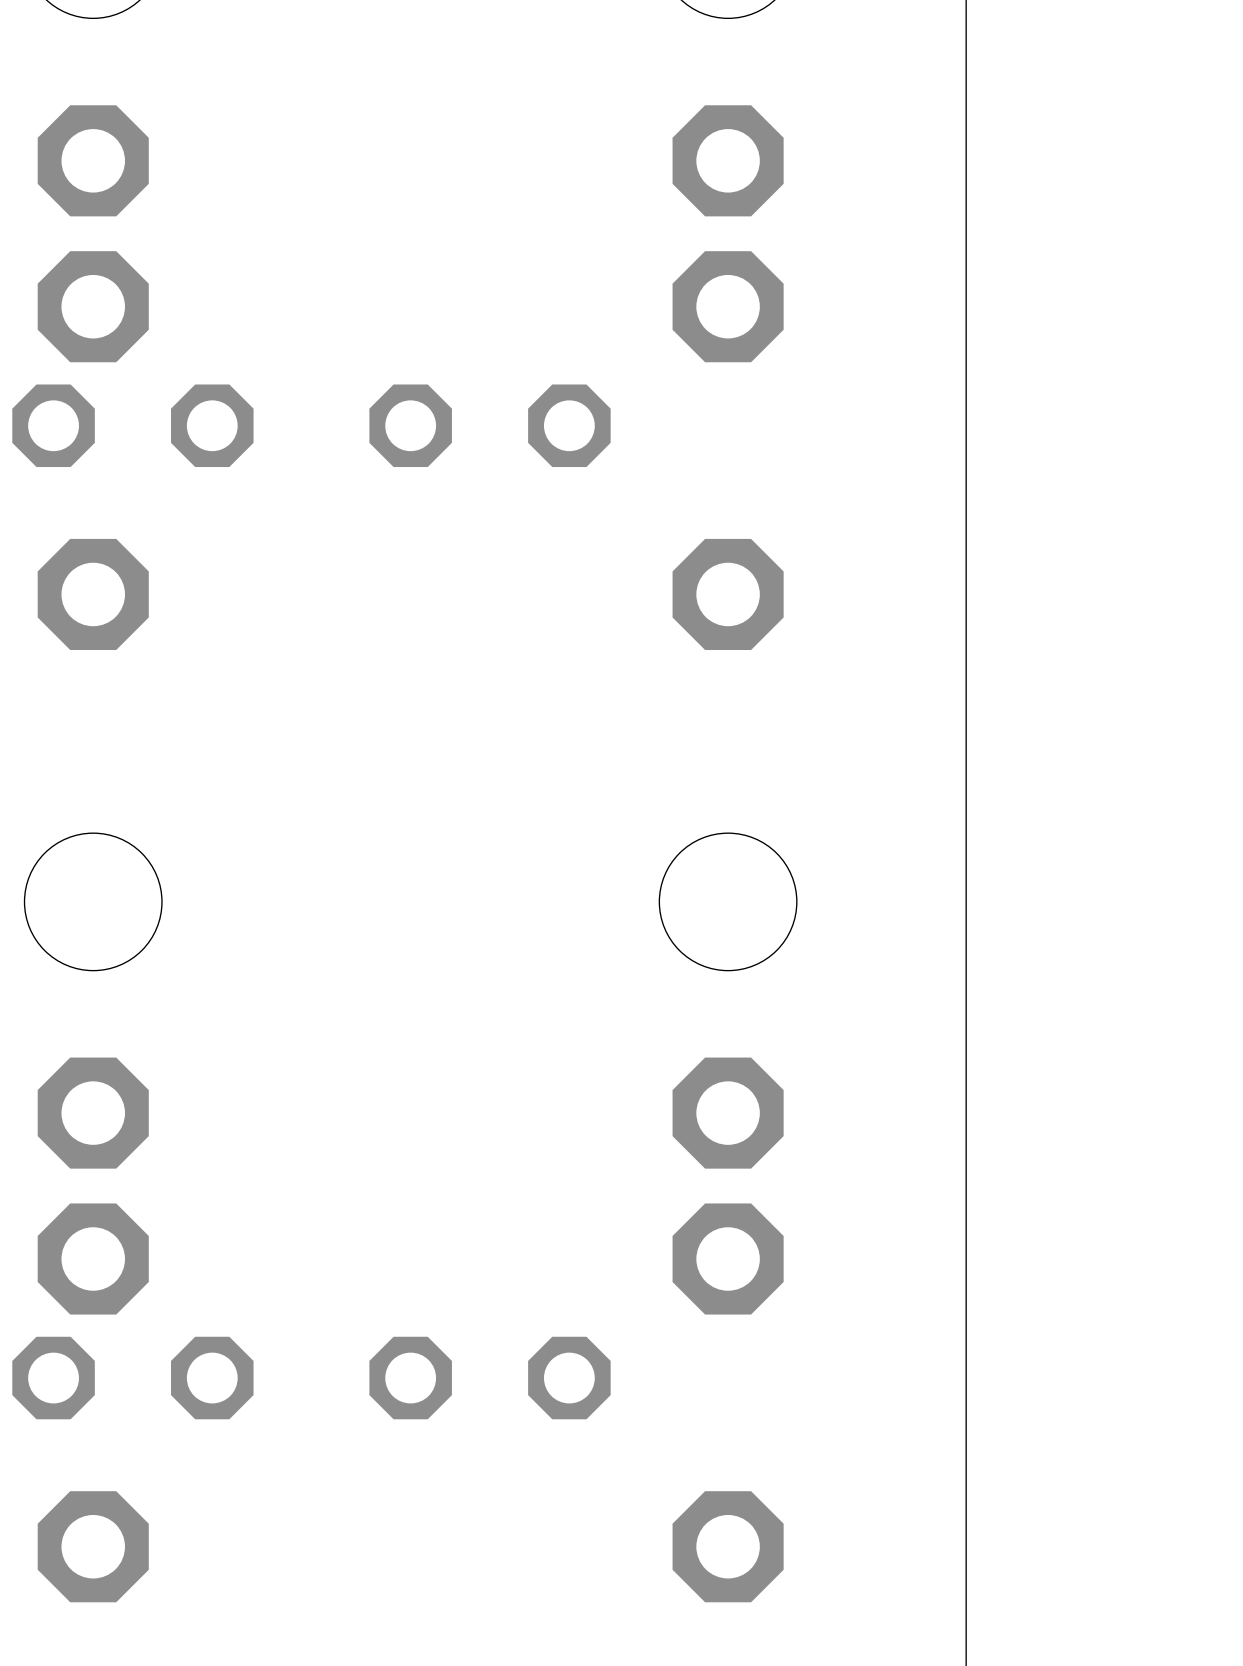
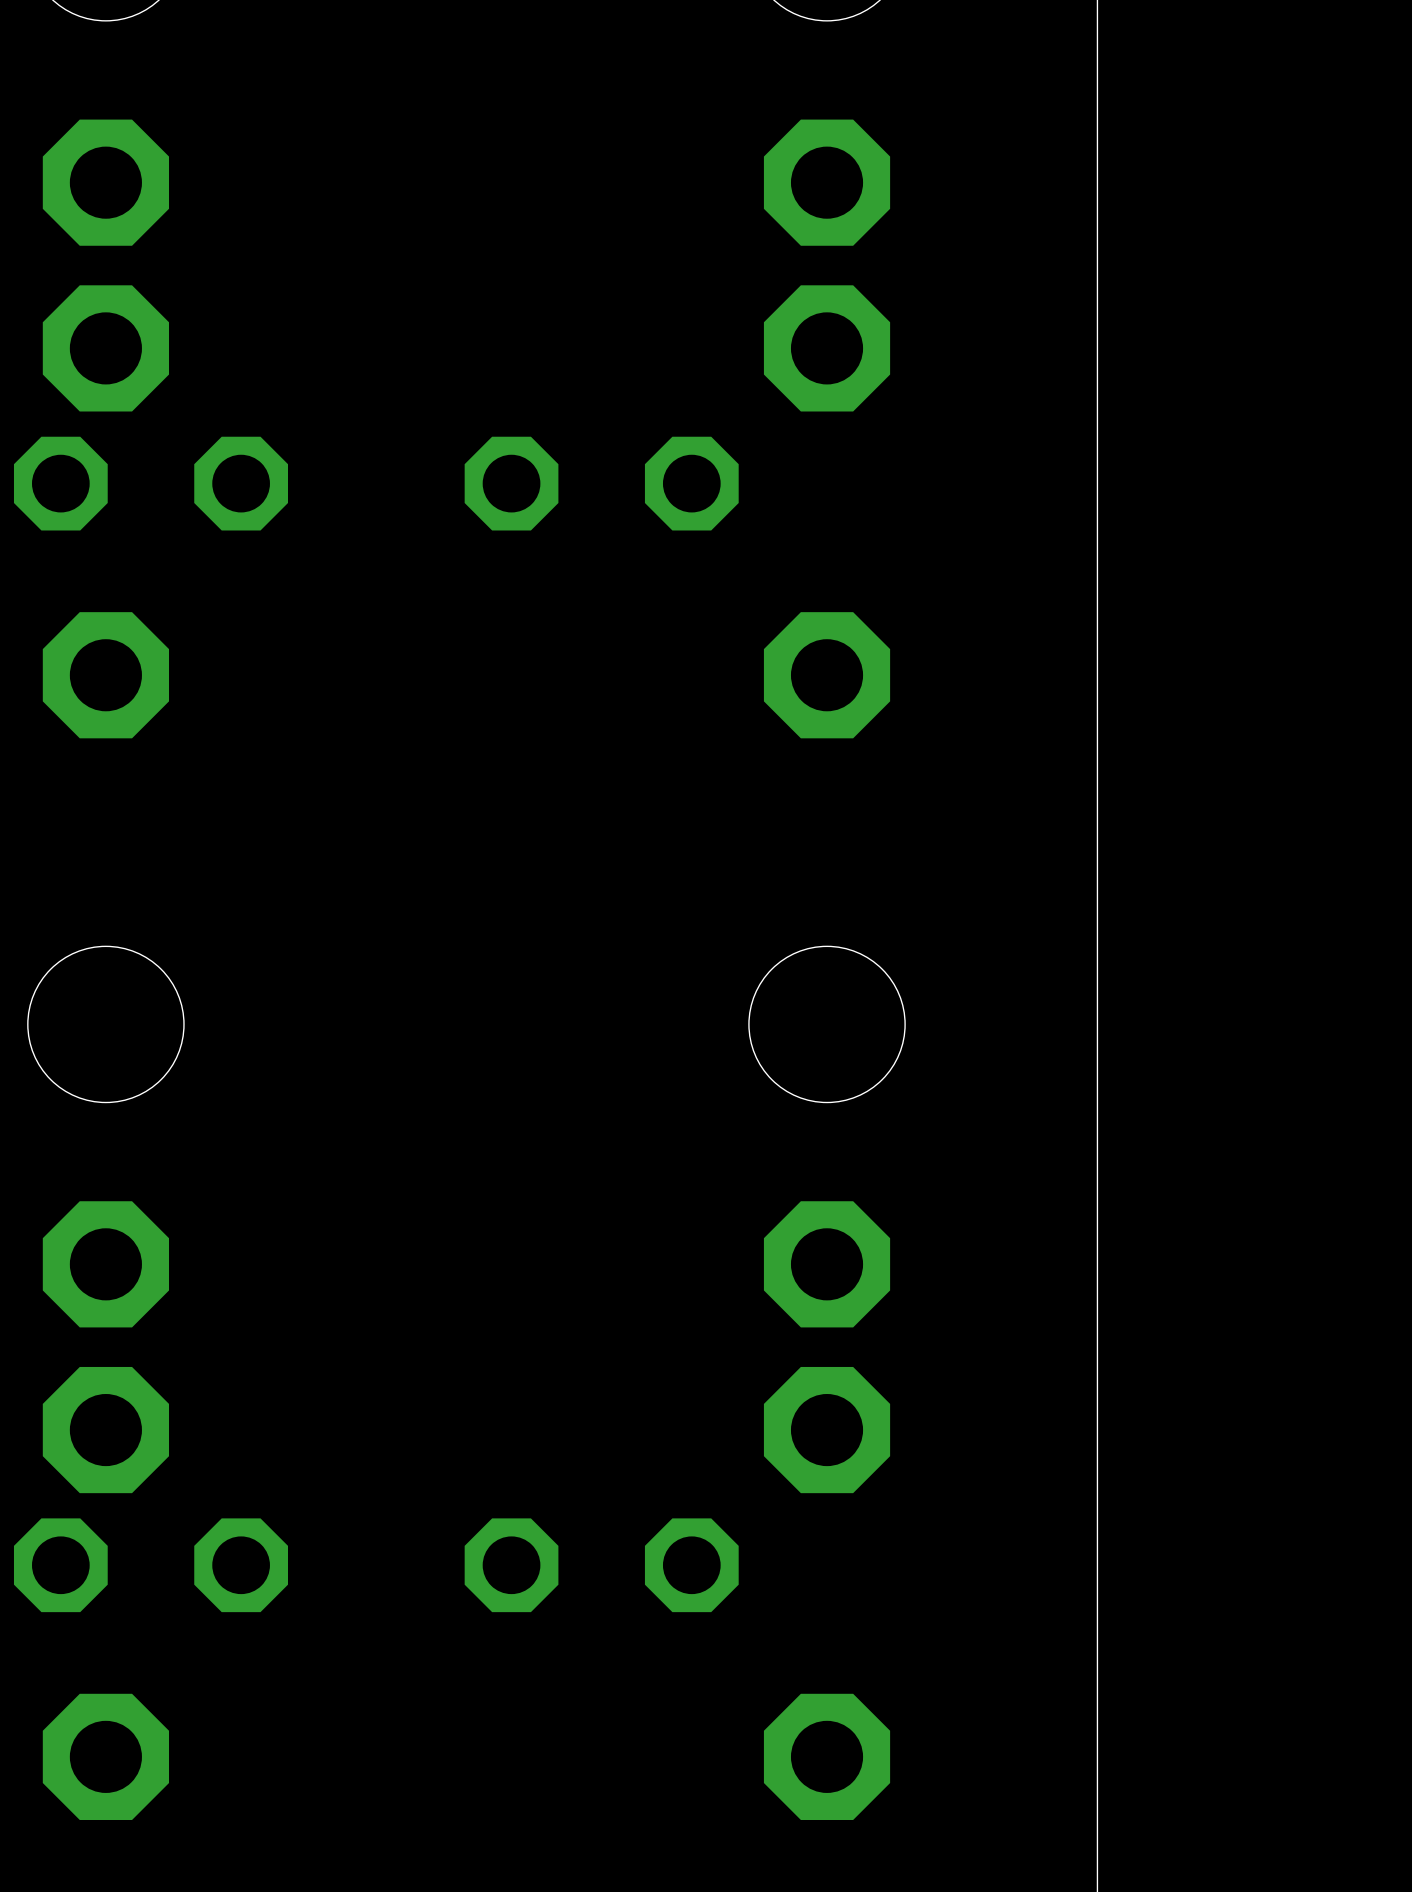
part position: (490, 425) -> (601, 483)
part position: (490, 1378) -> (601, 1565)

